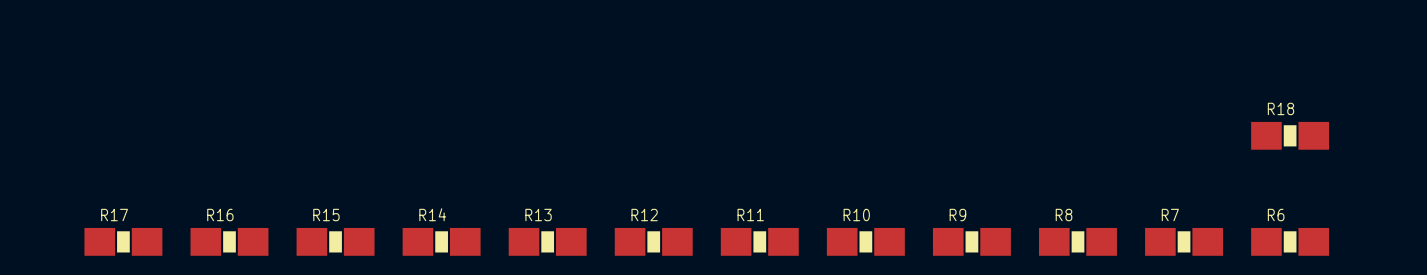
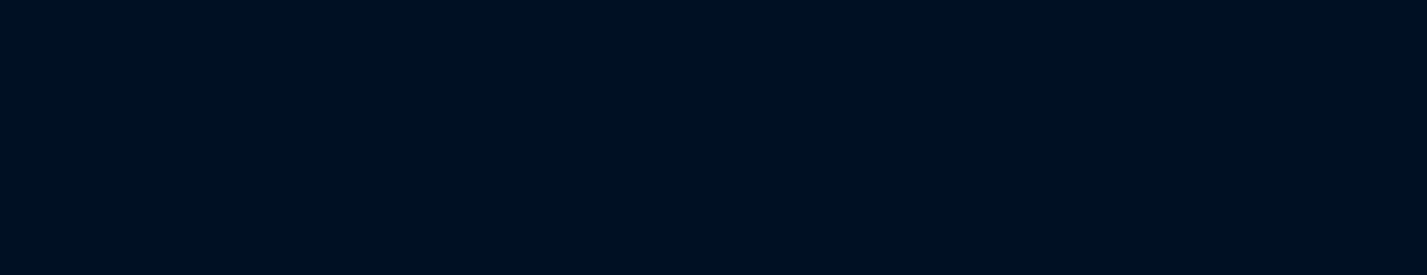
R18: (1290, 135) -> none
R17: (123, 241) -> none
R16: (229, 241) -> none
R15: (335, 241) -> none
R14: (441, 241) -> none
R13: (547, 241) -> none
R12: (653, 241) -> none
R11: (759, 241) -> none
R10: (865, 241) -> none
R9: (971, 241) -> none
R8: (1077, 241) -> none
R7: (1184, 241) -> none
R6: (1290, 241) -> none

